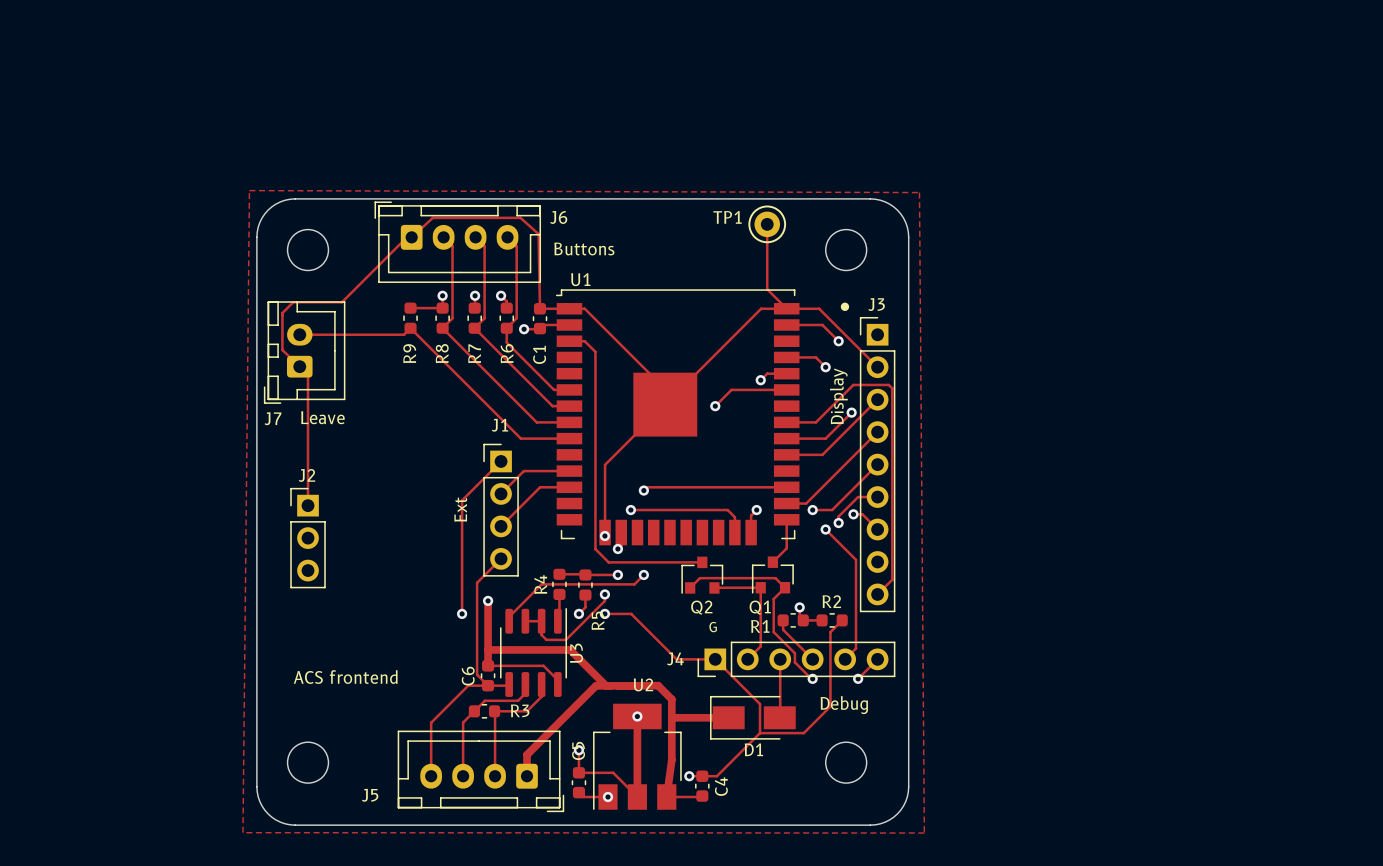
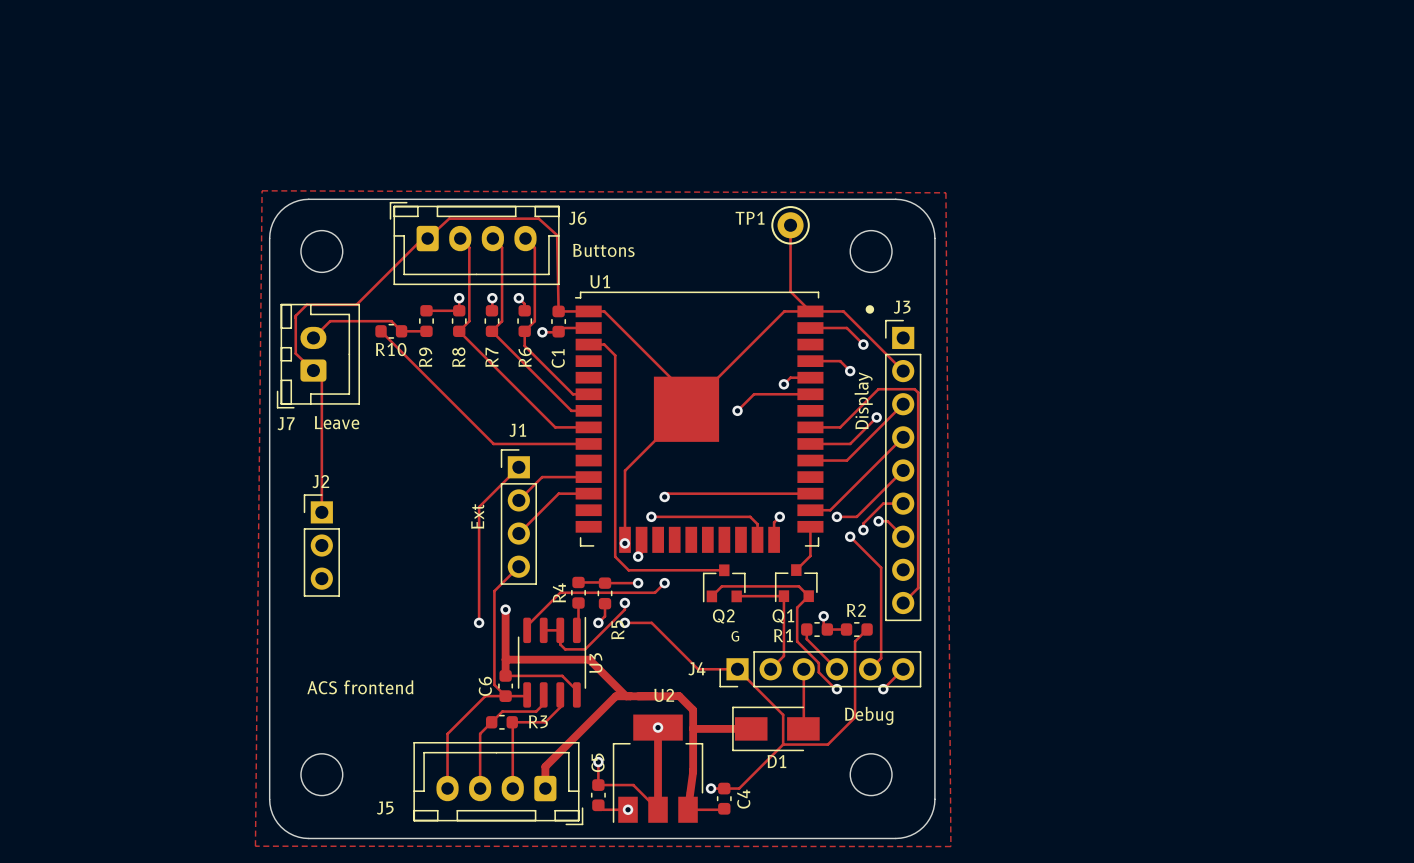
R10: none -> (391, 331)
track: none -> (426, 331) (401, 331) (391, 321) (330, 321) (313, 337)
track: (299, 334) (404, 334) (410, 328) (520, 438) -> (381, 331) (493, 443) (539, 443)

